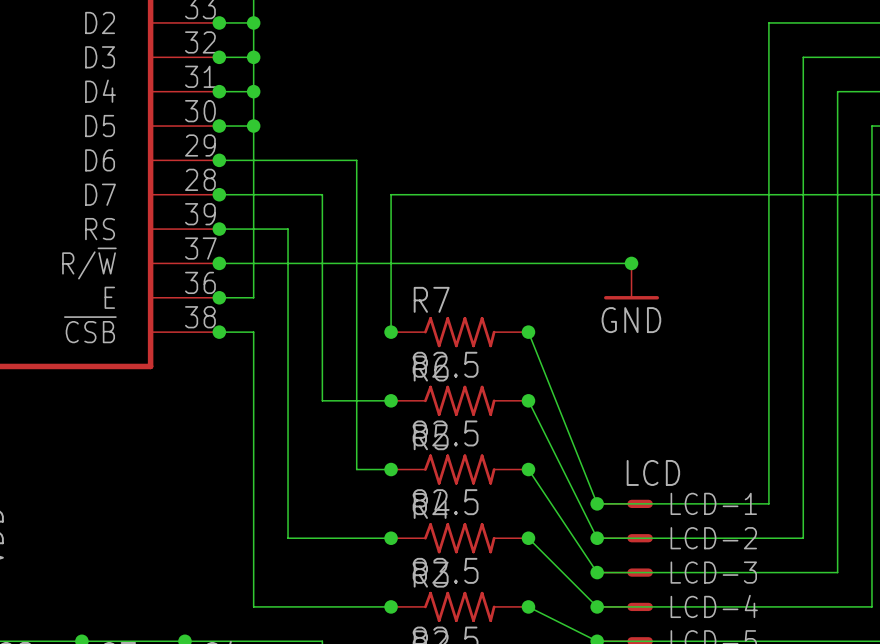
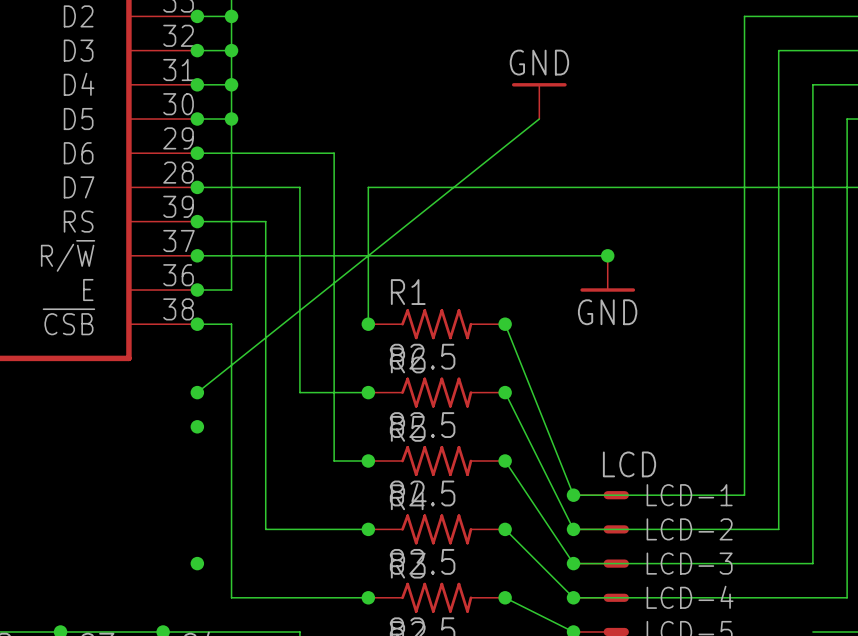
power symbol: none -> GND (539, 101)
wire: none -> (539, 119) (197, 392)
R7 name: R7 (431, 299) -> R1 (408, 292)
junction: none -> (197, 392)
junction: none -> (197, 426)
junction: none -> (197, 563)
wire: (597, 641) (837, 641) -> none

